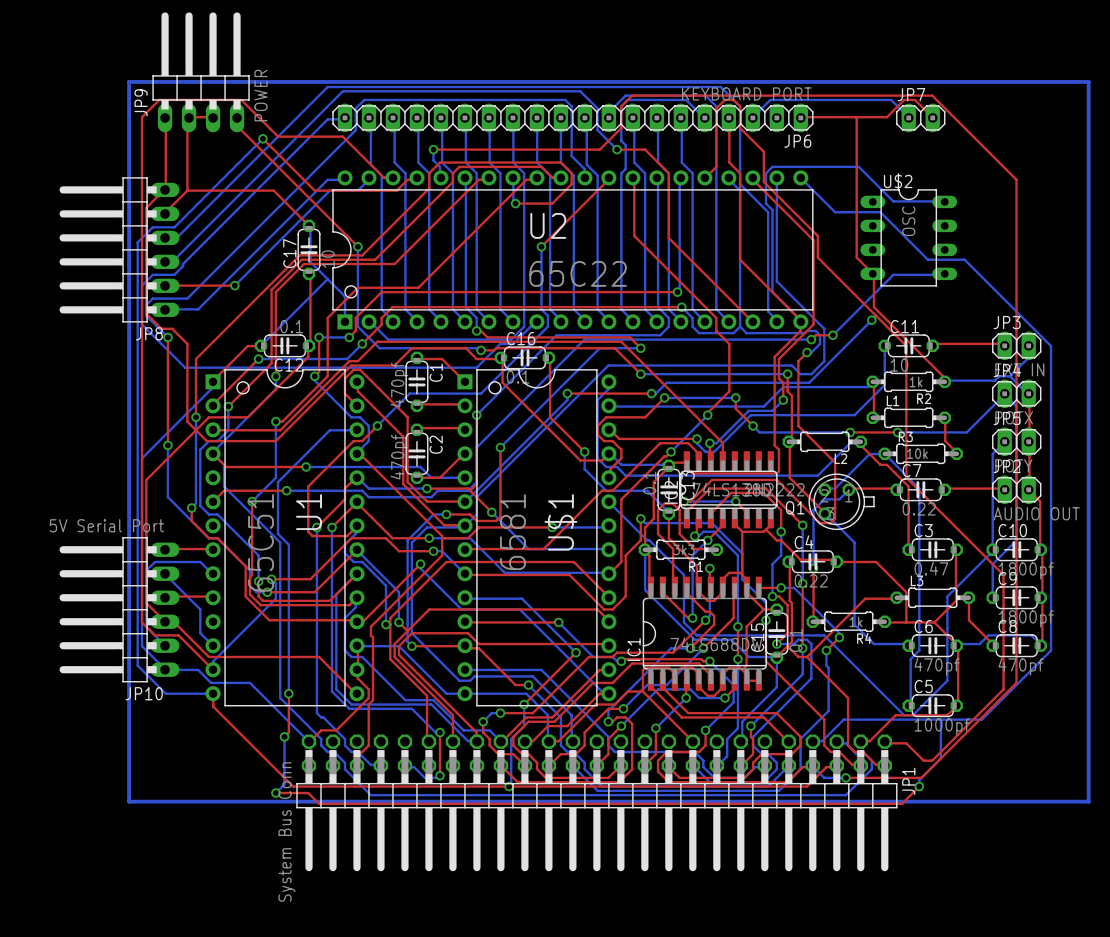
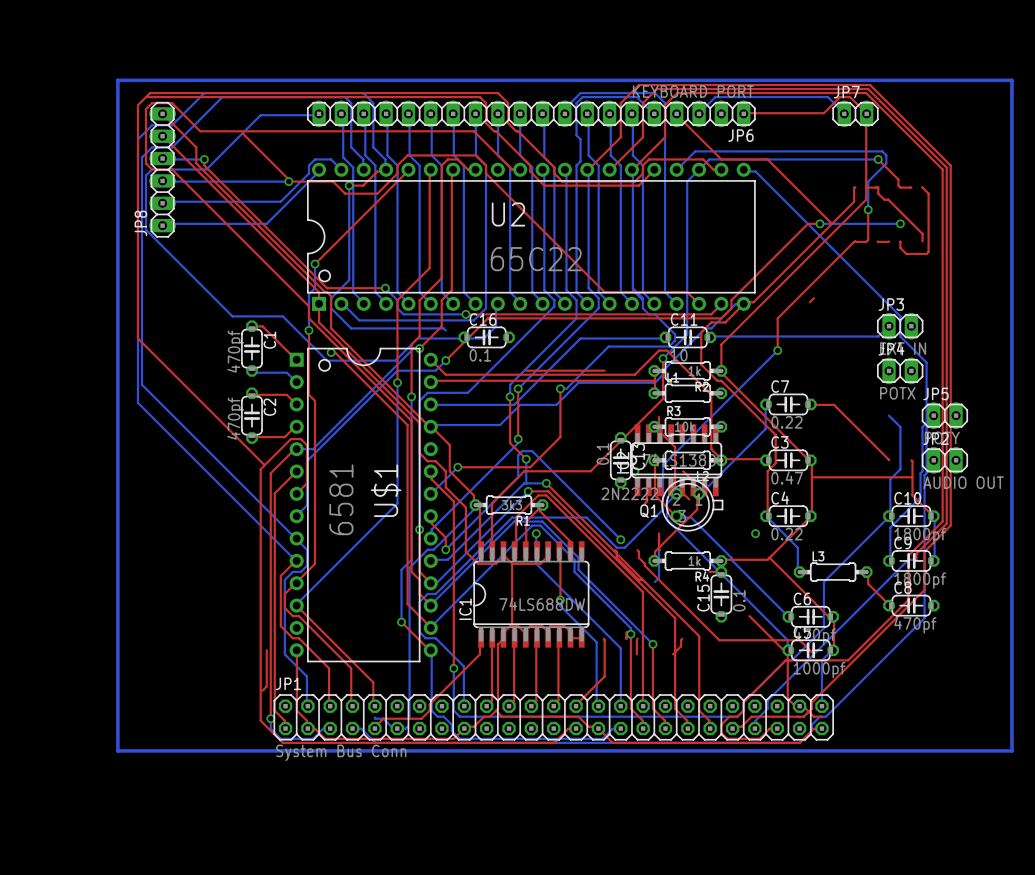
JP9: POWER (201, 72) -> none
top track: (729, 95) (632, 95) (621, 106) (621, 128) (599, 149) (433, 149) -> (677, 93) (673, 97)
top track: none -> (146, 97) (150, 93) (498, 93) (508, 103) (508, 123) (554, 167) (554, 173) (562, 181) (634, 181) (642, 173) (642, 165) (648, 159) (703, 159) (713, 169) (721, 169)
top track: (241, 99) (278, 136) -> (430, 605) (419, 593) (419, 579) (411, 571) (411, 420) (308, 318) (308, 306) (172, 169) (152, 169) (146, 163) (146, 109) (152, 103) (172, 103) (200, 131) (256, 131)
bottom track: (364, 99) (355, 108) (355, 130) (187, 298) (152, 298) (146, 305) (146, 315) (167, 337) -> (337, 97) (222, 97) (172, 147) (152, 147) (142, 157) (142, 384) (306, 549)
bottom track: (373, 99) (565, 99) (571, 106) (571, 156) (584, 169) (584, 177) -> (345, 97) (351, 103) (351, 147) (363, 159) (363, 169)
top track: (724, 99) (733, 99) (740, 106) (740, 128) (763, 151) (763, 181) (817, 235) (817, 257) (906, 346) (906, 477) (1003, 574) (1003, 689) (932, 760) (923, 760) (906, 743) (884, 743) (884, 741) -> none
top track: (150, 108) (142, 117) (142, 622) (154, 635) (178, 635) (213, 669) -> (137, 105) (137, 338) (264, 465)
top track: (165, 117) (165, 188) (146, 207) (146, 313) (161, 328) (172, 328) (187, 343) (187, 421) (206, 441) (275, 441) (351, 365) (394, 365) (411, 348) (465, 348) (476, 359) (502, 359) (502, 382) (580, 460) (601, 460) (608, 453) -> none
top track: (213, 117) (189, 117) (187, 119) (187, 190) -> none
top track: (237, 117) (237, 125) (357, 246) -> none
top track: (856, 117) (856, 257) (873, 274) (873, 307) (943, 376) (944, 381) -> none
top track: none -> (866, 113) (866, 187)
bottom track: (327, 119) (174, 274) (152, 274) (142, 285) (142, 324) (185, 367) (476, 367) (500, 343) (513, 343) (534, 322) -> (206, 169) (152, 169) (146, 175) (146, 229) (232, 316) (282, 316) (327, 360) (395, 360) (417, 338) (484, 338) (496, 326) (496, 304)
bottom track: none -> (302, 115) (260, 115) (242, 133)
top track: (729, 119) (729, 162) (740, 173) (740, 259) (800, 321) -> (677, 115) (721, 159) (767, 159) (832, 223)
top track: (342, 136) (383, 177) (392, 177) -> (317, 131) (473, 131) (502, 159)
via: (262, 138) -> none
top track: none -> (162, 136) (319, 292) (319, 322) (419, 423) (419, 453) (427, 461) (435, 461)
top track: (716, 143) (716, 166) (704, 177) -> (665, 137) (631, 169)
bottom track: (433, 149) (433, 160) (439, 166) (440, 177) -> none
via: (433, 149) -> none
top track: (617, 149) (645, 149) (668, 173) (668, 238) (740, 309) -> (475, 155) (486, 165) (486, 173) (604, 292) (687, 292)
bottom track: (617, 149) (597, 130) (597, 108) (580, 91) (342, 91) (172, 261) (165, 261) -> none
via: (617, 149) -> none
top track: (513, 162) (560, 162) -> (222, 97) (479, 97) (486, 103) (486, 123) (520, 155)
bottom track: none -> (162, 158) (204, 159)
top track: none -> (204, 159) (204, 165) (327, 288) (385, 288)
via: none -> (204, 159)
top track: (483, 166) (459, 166) (452, 173) (452, 181) (375, 259) (301, 259) (271, 289) (271, 363) (228, 406) -> (447, 159) (441, 165) (441, 278) (419, 300) (419, 336) (411, 344) (411, 396)
top track: (493, 166) (541, 166) -> (457, 159) (467, 169) (475, 169)
bottom track: (772, 166) (766, 173) (766, 203) (772, 210) (772, 292) (800, 321) -> none
bottom track: (858, 166) (893, 201) (944, 201) -> (797, 159) (878, 159)
top track: none -> (878, 159) (898, 179) (900, 187) (911, 187)
via: none -> (878, 159)
JP8 footprint: [59, 177, 180, 323] -> [149, 102, 176, 238]
bottom track: (224, 177) (174, 227) (152, 227) (137, 242) (137, 665) (165, 693) (213, 693) -> none
bottom track: (368, 177) (357, 190) (329, 190) (234, 285) -> (341, 169) (331, 159) (315, 159) (308, 165) (308, 173) (280, 201) (164, 201) (162, 203)
bottom track: none -> (386, 169) (385, 159) (373, 147) (373, 103) (363, 93) (204, 93) (172, 125) (152, 125) (137, 139) (137, 402) (296, 560)
top track: none -> (408, 169) (315, 264)
top track: none -> (430, 169) (429, 268) (397, 300) (397, 382)
bottom track: (464, 177) (465, 307) (476, 318) (476, 330) -> none
bottom track: (512, 177) (513, 201) (515, 203) -> none
top track: (536, 177) (534, 179) (526, 179) (418, 287) (357, 287) (327, 318) (327, 376) (282, 421) (275, 421) -> none
bottom track: none -> (542, 169) (544, 171) (544, 290) (554, 300) (554, 306) (467, 392) (427, 392) (419, 400) (419, 529)
top track: (608, 177) (541, 246) -> none
bottom track: none -> (564, 169) (566, 171) (566, 290) (576, 300) (576, 318) (510, 384) (510, 396)
top track: (632, 177) (634, 235) (716, 318) (716, 330) (729, 343) (729, 391) (707, 415) -> (587, 169) (620, 137) (620, 103) (638, 85) (870, 85) (950, 165) (950, 525) (924, 551) (924, 589) (811, 702) (811, 708) (803, 716) (797, 716)
bottom track: none -> (587, 169) (588, 288) (598, 298) (598, 308) (518, 388)
top track: none -> (609, 169) (642, 137) (642, 103) (657, 89) (868, 89) (946, 167) (946, 523) (916, 553) (916, 559)
bottom track: (656, 177) (658, 307) (668, 318) (668, 326) (660, 335) (556, 335) (476, 415) -> none
bottom track: (680, 177) (679, 289) (677, 292) -> (631, 169) (632, 288) (642, 300)
bottom track: (728, 177) (740, 190) -> (717, 159) (709, 159) (687, 181)
bottom track: none -> (676, 169) (695, 151) (882, 151) (886, 155) (886, 163) (868, 181) (868, 209)
top track: (752, 177) (813, 240) (813, 324) (778, 359) (778, 378) (783, 382) (783, 400) -> none
bottom track: (776, 177) (776, 281) (824, 328) (824, 361) (811, 374) (800, 374) (791, 365) (608, 365) (476, 497) (476, 514) -> (457, 467) (441, 483)
top track: (1014, 177) (1016, 179) (1016, 682) (921, 777) (884, 777) -> (942, 169) (942, 521) (908, 555) (908, 600) (848, 660) (785, 660) (743, 702) (743, 710) (737, 716) (729, 716) (721, 724) (721, 732) (727, 738) (759, 738) (769, 728) (777, 728)
bottom track: (344, 179) (327, 179) (198, 309) (165, 309) -> (319, 171) (266, 223) (164, 223) (162, 225)
top track: (487, 179) (478, 179) (394, 264) (303, 264) (275, 292) (275, 376) -> (451, 171) (451, 290) (441, 300) (441, 326) (419, 348)
top track: (571, 179) (571, 184) (552, 203) (515, 203) -> (530, 171) (544, 185) (638, 185) (654, 169)
bottom track: (802, 179) (835, 212) (880, 212) (927, 259) (964, 259) (1051, 346) (1051, 650) (981, 719) (843, 719) (822, 741) (812, 741) -> (745, 171) (755, 171) (900, 316) (900, 336) (926, 362) (924, 618) (825, 716) (819, 716) (811, 724) (811, 730) (799, 742) (375, 742) (361, 728) (352, 728)
top track: (429, 181) (429, 188) (362, 255) (299, 255) (196, 359) (196, 417) -> (397, 173) (377, 193) (345, 193) (333, 181)
bottom track: none -> (162, 180) (288, 181)
top track: (187, 190) (165, 213) -> none
top track: (187, 190) (273, 190) (309, 225) -> none
via: none -> (288, 181)
top track: (360, 190) (396, 190) -> (349, 185) (363, 185) (367, 181)
via: none -> (349, 185)
top track: none -> (855, 187) (854, 201) (753, 302) (743, 303)
top track: none -> (866, 187) (878, 187) (878, 193) (884, 199) (888, 199) (922, 233) (922, 241)
top track: none -> (922, 187) (928, 193) (928, 252) (926, 254) (906, 254) (900, 247) (900, 241)
via: (515, 203) -> none
top track: none -> (868, 209) (868, 239) (866, 241) (854, 241) (777, 318) (777, 350)
via: none -> (868, 209)
bottom track: (309, 225) (310, 261) (344, 296) (344, 321) -> none
bottom track: none -> (819, 223) (900, 223)
via: none -> (819, 223)
via: none -> (900, 223)
bottom track: (165, 237) (165, 235) (178, 235) (327, 86) (720, 86) (740, 106) (740, 184) (768, 212) (768, 311) (776, 321) -> none
U$2: OSC (908, 237) -> none
bottom track: (357, 246) (357, 315) -> (349, 185) (349, 280) (331, 298)
via: (357, 246) -> none
bottom track: (541, 246) (541, 309) (547, 315) (547, 326) (481, 393) (470, 393) -> (445, 360) (435, 370)
via: (541, 246) -> none
C17: 10 (309, 249) -> none
top track: none -> (877, 241) (889, 241)
top track: (309, 273) (310, 343) (308, 346) (308, 356) (247, 417) (208, 417) (146, 479) (146, 603) (165, 622) (174, 622) (208, 657) (316, 657) -> (308, 330) (308, 394) (315, 400) (315, 563) (284, 593) (284, 608) (292, 616)
bottom track: (944, 273) (893, 274) (832, 335) -> none
bottom track: (327, 279) (261, 345) -> none
bottom track: none -> (315, 264) (315, 288) (308, 294) (308, 330)
via: none -> (315, 264)
top track: (234, 285) (165, 285) -> none
via: (234, 285) -> none
top track: (677, 292) (381, 292) (355, 318) (355, 330) (349, 337) -> none
via: (677, 292) -> none
bottom track: none -> (385, 288) (397, 300) (397, 308) (403, 314) (465, 314)
via: none -> (385, 288)
top track: (681, 307) (392, 307) (381, 318) (381, 324) (362, 343) -> none
via: (681, 307) -> none
bottom track: (871, 320) (809, 382) (666, 382) (655, 393) (651, 393) -> none
via: (871, 320) -> none
top track: none -> (721, 303) (711, 314) (465, 314)
top track: (800, 322) (800, 330) (774, 356) (774, 445) (778, 449) (778, 471) (776, 473) (692, 473) (688, 469) (686, 460) (686, 462) (671, 462) (653, 482) (653, 518) (645, 527) (644, 549) (649, 555) (650, 586) -> none
bottom track: none -> (687, 308) (687, 334) (663, 358)
top track: (476, 330) (481, 330) (487, 337) (526, 337) -> (445, 360) (488, 318)
via: (476, 330) -> none
JP8 name position: JP8 (149, 333) -> JP8 (140, 223)
via: none -> (465, 314)
bottom track: (705, 333) (733, 333) (740, 326) (746, 333) (804, 333) (807, 330) (815, 330) (819, 335) (819, 343) (811, 352) (807, 352) -> (654, 314) (675, 334) (675, 340) (669, 346) (608, 346) (566, 388) (560, 388)
top track: (832, 335) (815, 335) (811, 339) -> none
via: (832, 335) -> none
top track: (167, 337) (167, 445) -> none
via: (167, 337) -> none
top track: (319, 337) (319, 371) (314, 376) -> none
bottom track: (319, 337) (349, 337) -> none
via: (319, 337) -> none
via: (349, 337) -> none
top track: (629, 337) (640, 348) -> (584, 318) (721, 318) (731, 308) (731, 300) (807, 223) (819, 223)
bottom track: (811, 339) (584, 339) (476, 447) (476, 482) (468, 490) (437, 490) (431, 497) (368, 497) (362, 490) (286, 490) -> none
via: (811, 339) -> none
bottom track: (362, 343) (347, 359) (258, 359) -> none
via: (362, 343) -> none
top track: (261, 345) (247, 346) (213, 381) -> none
top track: none -> (251, 326) (262, 326) (296, 359)
C12: 0.1 (285, 345) -> none
bottom track: (884, 345) (884, 384) (854, 415) (750, 415) (714, 451) (705, 451) (696, 443) (696, 438) -> none
C11 position: (908, 345) -> (687, 337)
top track: (932, 345) (934, 343) (1003, 343) (1004, 345) -> none
bottom track: none -> (889, 326) (878, 336) (710, 337)
JP3 position: (1016, 345) -> (900, 326)
bottom track: (1028, 345) (1027, 359) (1010, 376) -> none
bottom track: (640, 348) (599, 348) (500, 447) -> none
via: (640, 348) -> none
via: none -> (308, 330)
top track: (481, 350) (493, 350) (496, 348) (614, 348) (640, 374) -> none
via: (481, 350) -> none
top track: (807, 352) (798, 361) (798, 425) -> (743, 304) (725, 322) (711, 322) (701, 332) (701, 364) (741, 400)
via: (807, 352) -> none
top track: (416, 357) (442, 359) (464, 381) -> (721, 459) (711, 449) (711, 394) (667, 350) (659, 350) (634, 374) (445, 374) (430, 359)
top track: (548, 357) (550, 417) (584, 451) -> none
bottom track: none -> (665, 337) (580, 338) (514, 404) (430, 404)
top track: (258, 359) (213, 405) -> none
via: (258, 359) -> none
bottom track: none -> (419, 348) (413, 348) (313, 449) (296, 449)
via: none -> (419, 348)
via: none -> (777, 350)
top track: none -> (331, 352) (335, 352) (407, 425) (407, 604) (430, 627)
via: none -> (331, 352)
bottom track: (640, 374) (787, 374) -> none
via: (640, 374) -> none
top track: (787, 374) (787, 391) (791, 395) (791, 438) (788, 441) (789, 477) (824, 513) -> none
via: (787, 374) -> none
bottom track: (275, 376) (275, 389) (213, 453) (224, 464) (224, 486) (280, 542) (280, 698) (321, 739) (321, 745) (327, 752) (334, 752) (344, 762) (344, 769) (370, 795) (845, 795) (871, 769) (871, 760) (865, 754) (856, 754) (845, 743) (837, 743) (836, 741) -> none
via: (275, 376) -> none
bottom track: (314, 376) (314, 380) (351, 417) (360, 417) (368, 425) (368, 441) (356, 453) -> none
via: (314, 376) -> none
bottom track: (1010, 376) (999, 376) (994, 380) (944, 381) -> none
bottom track: (1010, 376) (1028, 393) -> none
top track: none -> (663, 358) (663, 398) (590, 471) (524, 471) (492, 503) (492, 550)
via: none -> (663, 358)
bottom track: (213, 381) (211, 382) (211, 389) (142, 458) (142, 646) (165, 669) (198, 669) (211, 682) (249, 682) (309, 741) -> none
top track: (356, 381) (357, 391) (403, 436) (403, 484) (444, 525) (464, 525) -> none
C1 position: (416, 381) -> (251, 348)
bottom track: (608, 381) (608, 389) (597, 400) (597, 458) (606, 466) (617, 466) (625, 475) (817, 475) (850, 443) (860, 441) -> none
top track: (872, 381) (872, 417) -> none
bottom track: (872, 381) (867, 387) (783, 387) (763, 406) (705, 406) -> (743, 303) (735, 304) (711, 328) (705, 328) (663, 370) (663, 374) (654, 382)
R2 position: (908, 381) -> (687, 370)
via: none -> (445, 360)
bottom track: none -> (251, 370) (252, 372) (286, 372) (296, 382)
bottom track: (429, 393) (409, 393) (377, 425) -> (397, 370) (306, 461) (306, 495)
bottom track: (567, 393) (567, 400) (464, 501) -> none
via: (567, 393) -> none
via: (651, 393) -> none
top track: none -> (654, 370) (654, 393)
JP4 position: (1016, 393) -> (900, 370)
top track: (1028, 393) (1028, 489) (1040, 501) (1040, 549) (1042, 551) (1042, 596) (1040, 597) (1042, 598) (1042, 644) (1040, 645) -> none
top track: (664, 397) (645, 417) (606, 417) (597, 425) (597, 434) (604, 441) (612, 441) (621, 449) (621, 458) (610, 469) (610, 477) (608, 477) -> none
bottom track: (664, 397) (735, 397) -> none
via: (664, 397) -> none
top track: (735, 397) (735, 408) (753, 425) -> none
via: (735, 397) -> none
bottom track: (783, 400) (772, 410) (748, 410) (716, 443) (709, 443) -> none
via: (783, 400) -> none
top track: (356, 405) (344, 393) (344, 378) (353, 369) (360, 369) (407, 417) (407, 482) (427, 501) (464, 501) -> none
top track: (416, 405) (464, 405) -> (654, 380) (430, 382)
bottom track: (608, 405) (623, 406) -> (430, 426) (431, 425) (500, 425) (520, 404) (556, 404) (578, 382)
bottom track: (228, 406) (228, 430) (217, 441) (208, 441) (200, 449) (200, 505) (208, 514) (217, 514) (258, 555) (258, 581) -> none
via: (228, 406) -> none
bottom track: none -> (397, 382) (397, 503) (296, 605)
via: none -> (397, 382)
top track: none -> (518, 388) (518, 439)
via: none -> (518, 388)
top track: none -> (560, 388) (560, 437) (530, 467) (457, 467)
via: none -> (560, 388)
top track: (476, 415) (476, 484) (470, 490) (468, 488) (427, 488) -> none
via: (476, 415) -> none
bottom track: (707, 415) (671, 451) -> none
via: (707, 415) -> none
bottom track: (196, 417) (196, 503) (191, 508) -> none
via: (196, 417) -> none
top track: none -> (251, 393) (252, 394) (286, 394) (296, 404)
L1 position: (908, 417) -> (687, 393)
top track: (944, 417) (945, 441) (956, 453) -> none
bottom track: (275, 421) (275, 477) (252, 501) -> none
via: (275, 421) -> none
bottom track: none -> (411, 396) (411, 559) (401, 569) (401, 622)
via: none -> (411, 396)
top track: none -> (510, 396) (510, 443) (526, 459)
via: none -> (510, 396)
top track: (377, 425) (362, 441) (353, 441) (308, 486) (308, 531) (312, 536) (347, 536) (356, 525) -> none
via: (377, 425) -> none
bottom track: (753, 425) (759, 432) (850, 432) -> none
via: (753, 425) -> none
top track: (213, 429) (280, 430) (349, 361) (357, 361) (377, 341) (621, 341) (722, 443) (722, 460) -> none
bottom track: (356, 429) (329, 430) (278, 482) (278, 533) (288, 544) (288, 693) -> none
top track: (416, 429) (418, 428) (463, 428) (464, 429) -> none
top track: (608, 429) (619, 438) (696, 438) -> none
bottom track: none -> (766, 404) (765, 429) (699, 495) (699, 493)
top track: none -> (810, 404) (834, 404) (889, 460)
top track: (850, 432) (897, 432) -> none
via: (850, 432) -> none
bottom track: (897, 432) (966, 432) (1004, 393) (1016, 406) (1016, 540) (992, 564) (992, 597) -> none
via: (897, 432) -> none
via: (696, 438) -> none
L2 position: (824, 441) -> (687, 460)
top track: (860, 441) (858, 443) (880, 464) (886, 464) (908, 486) (908, 549) -> none
via: (709, 443) -> none
bottom track: (167, 445) (167, 497) (208, 538) (217, 538) (249, 570) (249, 585) (256, 592) (267, 592) -> none
via: (167, 445) -> none
top track: (500, 447) (500, 516) (496, 520) (476, 520) -> (453, 668) (453, 501) (441, 489)
via: (500, 447) -> none
bottom track: (584, 451) (584, 469) (606, 490) (647, 490) (668, 513) -> none
via: (584, 451) -> none
top track: (671, 451) (621, 499) (621, 562) (608, 573) -> none
via: (671, 451) -> none
top track: (213, 453) (226, 466) (306, 466) -> none
top track: none -> (296, 426) (284, 437) (251, 437)
top track: (356, 453) (357, 451) (442, 536) (442, 555) (370, 626) (370, 635) (373, 637) (373, 700) (368, 704) (368, 745) (357, 756) (356, 765) -> none
C2 position: (416, 453) -> (251, 415)
top track: none -> (430, 426) (449, 445) (449, 471) (473, 495) (473, 503) (479, 509) (481, 550)
bottom track: (608, 453) (621, 464) (668, 465) -> none
top track: none -> (654, 426) (675, 447) (675, 493) (676, 493)
R3 position: (920, 453) -> (687, 426)
top track: (463, 454) (439, 477) (416, 477) -> (429, 427) (331, 328) (331, 296) (196, 163) (196, 147) (162, 113)
bottom track: (884, 454) (869, 454) (835, 488) (824, 489) -> none
bottom track: (884, 454) (919, 488) (919, 650) (910, 659) (910, 704) (908, 705) -> none
top track: (698, 460) (696, 460) (696, 451) (688, 443) (660, 443) (612, 490) (601, 490) (543, 549) (464, 549) -> (445, 549) (445, 537) (431, 523) (430, 516)
bottom track: (306, 466) (420, 466) (431, 477) (464, 477) -> none
via: (306, 466) -> none
via: none -> (518, 439)
top track: none -> (296, 449) (270, 473) (270, 718)
top track: (356, 477) (344, 488) (344, 499) (316, 527) -> none
bottom track: (356, 477) (368, 488) (427, 488) -> none
via: (427, 488) -> none
bottom track: none -> (526, 459) (526, 483)
via: none -> (526, 459)
top track: none -> (721, 459) (766, 460)
top track: none -> (654, 460) (654, 495) (676, 516)
top track: (848, 489) (896, 489) -> none
bottom track: (848, 489) (839, 499) (824, 499) (813, 510) (813, 568) -> none
C7 position: (920, 489) -> (788, 404)
top track: (944, 489) (1004, 489) -> none
top track: none -> (911, 460) (912, 495) (933, 516)
top track: (286, 490) (224, 490) (213, 501) -> none
via: (286, 490) -> none
top track: (835, 492) (835, 518) (830, 523) (819, 523) (776, 479) (712, 479) (690, 501) (683, 501) (677, 508) -> (775, 463) (767, 471) (767, 515) (766, 516)
top track: (252, 501) (252, 574) (249, 577) (249, 594) (260, 605) (349, 605) (356, 597) -> none
via: (252, 501) -> none
top track: none -> (296, 471) (274, 493) (274, 710) (284, 720) (285, 728)
top track: (481, 501) (491, 512) -> (445, 471) (445, 487) (465, 507) (465, 551) (477, 563) (496, 563) (504, 555)
bottom track: (683, 501) (735, 501) -> none
via: (735, 501) -> none
Q1 position: (841, 501) -> (692, 505)
bottom track: (992, 501) (992, 551) (947, 596) (947, 680) (912, 715) (904, 715) (824, 635) (696, 635) (683, 622) (683, 574) (608, 501) -> (922, 471) (920, 473) (920, 497) (890, 527) (889, 560)
top track: (191, 508) (191, 520) (208, 538) (217, 538) (245, 566) (245, 596) (269, 620) (364, 620) (420, 564) -> none
via: (191, 508) -> none
top track: none -> (811, 477) (912, 477)
bottom track: (491, 512) (528, 549) (608, 549) -> none
via position: (491, 512) -> (457, 467)
top track: (668, 513) (668, 538) (696, 566) (696, 585) (698, 586) (699, 592) (707, 600) (714, 600) (722, 592) (722, 579) (729, 572) (740, 572) (746, 579) (748, 594) (763, 609) (746, 626) (746, 665) (742, 669) -> none
bottom track: (824, 513) (854, 542) (854, 624) (873, 644) (908, 644) (908, 645) -> none
top track: (446, 514) (470, 514) -> (430, 471) (431, 479) (435, 483)
bottom track: (446, 514) (433, 514) (407, 540) (407, 641) (411, 646) -> none
via: (446, 514) -> none
via: none -> (546, 483)
top track: (640, 518) (640, 540) (625, 555) (625, 596) (612, 609) (604, 609) (569, 574) (464, 573) -> none
bottom track: (640, 518) (645, 523) (712, 523) (742, 553) (742, 579) (766, 603) (766, 620) -> none
via: (640, 518) -> none
top track: (686, 518) (688, 510) (709, 488) (766, 488) (802, 525) -> none
top track: (710, 518) (712, 512) (731, 492) (763, 492) (781, 510) (781, 531) -> none
top track: (722, 518) (722, 525) (707, 540) -> none
top track: (770, 518) (770, 525) (763, 531) (742, 531) (742, 574) -> none
top track: none -> (528, 491) (548, 491) (675, 618) (675, 708) (687, 720) (687, 728)
bottom track: none -> (528, 491) (437, 581) (430, 583)
bottom track: (356, 525) (355, 533) (344, 544) (344, 553) (353, 562) (362, 562) (386, 585) (386, 624) -> none
bottom track: (464, 525) (463, 527) (427, 527) (411, 542) (411, 633) (452, 674) -> (777, 350) (663, 465) (663, 509) (624, 547) (616, 547) (586, 517) (512, 517) (435, 593) (427, 593) (419, 602) (419, 632)
bottom track: (608, 525) (608, 527) (552, 527) -> none
bottom track: none -> (676, 493) (667, 503) (667, 519) (787, 640) (788, 650)
top track: none -> (699, 493) (697, 495) (697, 509) (654, 551) (654, 560)
bottom track: (802, 525) (802, 583) -> none
via: (802, 525) -> none
bottom track: (316, 527) (316, 713) (344, 739) (344, 745) (351, 752) (357, 752) (370, 764) (380, 765) -> none
via: (316, 527) -> none
top track: (332, 527) (356, 501) (392, 538) (429, 538) -> none
via: (332, 527) -> none
top track: (552, 527) (478, 527) (468, 538) (442, 538) -> none
via position: (552, 527) -> (528, 491)
top track: (766, 529) (776, 540) (781, 540) (800, 559) (876, 562) (906, 592) (906, 622) -> none
bottom track: (781, 531) (781, 555) (772, 564) (772, 596) -> none
via: (781, 531) -> none
bottom track: (694, 536) (699, 536) (703, 531) (714, 531) (737, 555) (737, 626) -> none
via: (694, 536) -> none
U1: 65C51 (285, 537) -> none
bottom track: none -> (475, 505) (473, 509) (433, 549) (427, 549) (409, 567) (409, 718)
U$1 position: (536, 537) -> (363, 505)
top track: none -> (542, 505) (526, 521) (525, 550)
bottom track: (332, 538) (332, 585) -> (306, 505) (296, 516)
bottom track: (429, 538) (470, 538) (504, 572) (608, 573) -> none
via: (429, 538) -> none
bottom track: (707, 540) (692, 555) (692, 618) -> none
via: (707, 540) -> none
top track: none -> (538, 509) (570, 541) (570, 550)
top track: (165, 549) (213, 549) -> none
top track: (356, 549) (314, 592) (267, 592) -> none
bottom track: (356, 549) (398, 592) (398, 622) -> none
bottom track: (644, 549) (645, 590) (694, 639) (731, 639) (748, 657) (776, 657) (776, 687) (742, 721) (740, 741) -> none
R1 position: (680, 549) -> (509, 505)
top track: (716, 549) (694, 549) (679, 533) (679, 510) (673, 503) (664, 503) (658, 510) (658, 533) (673, 549) (673, 585) (674, 586) -> none
bottom track: none -> (676, 516) (691, 517) (788, 616)
bottom track: none -> (766, 516) (797, 547) (797, 571) (799, 572)
C3 position: (932, 549) -> (788, 460)
top track: (956, 549) (956, 600) (934, 622) (884, 621) -> none
bottom track: none -> (933, 516) (933, 560)
C10 position: (1016, 549) -> (911, 516)
top track: (433, 551) (398, 551) (386, 538) (351, 538) (310, 579) (271, 579) -> none
bottom track: (433, 551) (442, 551) (464, 573) -> (518, 439) (518, 443) (431, 529) (430, 538)
via: (433, 551) -> none
top track: (788, 561) (789, 600) (791, 603) (791, 641) (776, 657) -> none
C4 position: (812, 561) -> (788, 516)
bottom track: (420, 564) (420, 568) (461, 609) (519, 609) (604, 693) (608, 693) -> none
via: (420, 564) -> none
via: none -> (419, 529)
bottom track: none -> (536, 533) (536, 563) (620, 648) (620, 706)
via: none -> (536, 533)
via: (709, 568) -> none
top track: (813, 568) (812, 621) -> none
bottom track: (165, 573) (200, 609) (200, 633) (213, 645) -> none
bottom track: (213, 573) (200, 562) (154, 562) (146, 570) (146, 626) (165, 645) -> none
top track: (356, 573) (329, 600) (262, 600) (258, 596) (258, 581) -> none
bottom track: (356, 573) (336, 594) (336, 689) (351, 704) (431, 704) (468, 741) (476, 741) -> none
bottom track: none -> (620, 539) (532, 451) (522, 451) (518, 455) (518, 477) (445, 549)
via: none -> (620, 539)
bottom track: (271, 579) (275, 583) (275, 598) (213, 661) (213, 669) -> none
via: (271, 579) -> none
via: (258, 581) -> none
top track: (802, 583) (802, 648) -> none
via: (802, 583) -> none
via: none -> (445, 549)
top track: none -> (514, 550) (516, 549) (516, 517) (538, 495) (546, 495) (642, 591) (643, 706)
top track: none -> (548, 550) (546, 557) (540, 563) (512, 563)
top track: none -> (559, 550) (560, 600)
top track: (734, 586) (733, 618) (703, 648) -> none
top track: (758, 586) (759, 587) (781, 587) -> none
bottom track: (781, 587) (794, 587) (839, 633) (839, 637) -> none
via: (781, 587) -> none
via: (267, 592) -> none
top track: none -> (769, 557) (828, 616) (833, 616) (833, 650)
via: (772, 596) -> none
top track: (778, 596) (787, 605) (787, 633) (776, 644) -> (723, 559) (767, 559) (811, 515) (811, 461) (721, 372) (721, 344) (866, 199) (866, 187)
bottom track: none -> (916, 559) (908, 559) (767, 700) (767, 708) (755, 720) (754, 728)
top track: (165, 597) (213, 597) -> none
top track: none -> (296, 560) (280, 575) (280, 626) (292, 638) (298, 638) (329, 668) (330, 706)
bottom track: (356, 597) (355, 607) (344, 618) (344, 650) (351, 657) (362, 657) (405, 700) (433, 700) (463, 730) (489, 730) (500, 741) -> none
bottom track: (464, 597) (522, 598) (576, 652) -> (430, 560) (447, 559) (524, 483) (546, 483)
top track: (608, 597) (573, 562) (446, 562) (390, 618) (390, 659) (427, 695) (427, 741) (428, 741) -> none
top track: (896, 597) (865, 598) (807, 657) (798, 657) (787, 646) -> none
L3 position: (932, 597) -> (833, 572)
top track: (968, 597) (968, 620) (992, 645) -> none
C9 position: (1016, 597) -> (911, 560)
top track: none -> (512, 563) (512, 626)
top track: (694, 600) (705, 611) (709, 611) (714, 615) (714, 624) (690, 648) -> (644, 563) (719, 640) (799, 640) (811, 652)
bottom track: (332, 603) (332, 691) (349, 708) (411, 708) (435, 732) (439, 732) -> (306, 565) (300, 571) (292, 571) (284, 579) (284, 654) (306, 676) (307, 706)
JP10: 5V Serial Port (119, 609) -> none
top track: none -> (866, 572) (868, 583)
via: (692, 618) -> none
top track: (705, 620) (673, 652) (617, 652) (612, 657) (588, 657) (532, 713) (500, 713) -> none
via: (705, 620) -> none
top track: (766, 620) (766, 661) (824, 719) (824, 745) (830, 752) (839, 752) (852, 764) -> (732, 728) (733, 726) (741, 726) (751, 716) (791, 716)
via: (766, 620) -> none
top track: (464, 621) (558, 622) -> (430, 583) (419, 571) (419, 529)
top track: (608, 621) (597, 609) (429, 609) (394, 644) (394, 657) (452, 715) (452, 741) -> none
R4 position: (848, 621) -> (687, 560)
top track: (398, 622) (407, 631) -> (504, 555) (512, 563)
via: (398, 622) -> none
bottom track: (558, 622) (593, 657) (612, 657) (617, 661) (621, 661) -> none
via: (558, 622) -> none
via: (386, 624) -> none
top track: (737, 626) (737, 659) -> none
via: (737, 626) -> none
IC1 position: (704, 633) -> (531, 594)
top track: (839, 637) (826, 650) -> none
via: (839, 637) -> none
bottom track: none -> (560, 600) (560, 606) (596, 642) (596, 704) (598, 706)
via: none -> (560, 600)
bottom track: (776, 644) (794, 644) (798, 639) (807, 639) (811, 644) (811, 678) (753, 736) (753, 745) (761, 754) (768, 754) (776, 762) (776, 769) (763, 782) (709, 782) (692, 765) -> none
via: (776, 644) -> none
top track: none -> (296, 605) (373, 682) (374, 706)
top track: (356, 645) (357, 678) (368, 689) (368, 698) (336, 730) (321, 730) (309, 741) (309, 765) -> none
bottom track: (356, 645) (398, 646) (446, 693) (464, 693) -> none
bottom track: none -> (430, 605) (514, 521) (542, 521) (578, 557) (578, 569) (652, 644)
top track: (608, 645) (608, 644) (478, 644) (468, 633) (411, 633) (398, 646) (398, 654) (476, 732) (476, 741) -> none
C6 position: (932, 645) -> (810, 616)
top track: (956, 645) (958, 704) (947, 715) (895, 715) (869, 741) (860, 741) -> none
bottom track: (956, 645) (958, 644) (979, 644) (988, 635) (1031, 635) (1040, 645) -> none
C8 position: (1016, 645) -> (911, 605)
top track: (411, 646) (464, 645) (468, 648) (478, 648) (515, 685) (528, 685) -> none
via: (411, 646) -> none
bottom track: (690, 648) (671, 648) (608, 710) (608, 721) -> none
via: (690, 648) -> none
bottom track: (703, 648) (666, 685) (647, 685) (623, 708) -> none
via: (703, 648) -> none
bottom track: (802, 648) (802, 674) (750, 726) -> none
via: (802, 648) -> none
bottom track: (826, 650) (826, 665) (828, 667) (828, 710) (800, 739) (800, 749) -> (889, 415) (900, 427) (900, 469) (890, 479) (890, 515) (823, 581) (823, 628) (791, 660) (785, 660) (743, 702)
via: (826, 650) -> none
top track: (576, 652) (524, 704) -> none
via: (576, 652) -> none
top track: (319, 657) (356, 693) -> (294, 616) (298, 616) (351, 668) (352, 706)
bottom track: (737, 659) (737, 728) (727, 739) (727, 756) (716, 765) -> none
via: (737, 659) -> none
top track: (621, 661) (623, 659) (701, 659) (703, 661) (709, 661) -> none
via: (621, 661) -> none
bottom track: (709, 661) (733, 685) (733, 702) (705, 730) -> none
via: (709, 661) -> none
top track: none -> (401, 622) (430, 650)
via: none -> (401, 622)
bottom track: (464, 669) (541, 669) (608, 736) (608, 745) (614, 752) (694, 752) (703, 760) (703, 767) (714, 777) (744, 777) (755, 767) (764, 765) -> (430, 627) (532, 525) (540, 525) (574, 559) (574, 571) (630, 628) (630, 634)
top track: (608, 669) (599, 669) (552, 717) (526, 717) (500, 741) -> none
top track: none -> (630, 634) (630, 708) (642, 720) (643, 728)
via: none -> (630, 634)
bottom track: (470, 680) (474, 676) (532, 676) (571, 715) (572, 741) -> (435, 638) (463, 666) (464, 706)
top track: none -> (570, 638) (581, 638)
top track: none -> (481, 638) (479, 654) (429, 704) (429, 710) (421, 718) (383, 718) (374, 728)
top track: none -> (492, 638) (492, 700) (486, 706)
top track: none -> (514, 638) (514, 700) (509, 706)
top track: none -> (536, 638) (536, 700) (531, 706)
top track: none -> (559, 638) (558, 700) (553, 706)
top track: none -> (570, 638) (570, 632) (564, 626) (550, 626) (546, 630) (542, 626) (530, 626) (524, 632) (518, 626) (510, 626) (504, 632) (504, 638) (498, 644) (498, 708) (490, 716) (484, 716) (473, 726) (465, 726) (453, 738) (325, 738) (315, 728) (307, 728) (306, 720) (296, 710) (296, 650)
top track: (662, 681) (664, 689) (688, 713) (776, 713) (800, 736) (800, 745) (791, 754) (761, 754) (753, 762) (753, 769) (744, 777) (679, 777) (668, 765) -> none
top track: (710, 681) (709, 674) (699, 663) (632, 663) (612, 682) (593, 682) (554, 721) (528, 721) (513, 736) (513, 745) (522, 754) (528, 754) (537, 762) (537, 769) (545, 777) (608, 777) (620, 765) -> none
top track: (758, 681) (746, 681) (746, 674) (740, 667) (729, 667) (722, 674) (722, 687) (714, 695) (707, 695) (699, 687) (696, 672) (692, 667) (681, 667) (675, 674) (668, 667) (645, 667) (642, 669) (642, 691) -> none
bottom track: (528, 685) (560, 717) (560, 745) (567, 752) (573, 752) (584, 762) (584, 769) (601, 786) (768, 786) (788, 765) -> none
via: (528, 685) -> none
top track: (651, 687) (681, 717) (763, 717) (788, 741) -> (604, 644) (604, 676) (576, 706)
top track: none -> (652, 644) (652, 708) (665, 720) (665, 728)
via: none -> (652, 644)
top track: (642, 691) (692, 741) -> none
top track: (642, 691) (627, 691) (614, 704) (595, 704) (558, 741) (548, 741) -> none
top track: (213, 693) (213, 706) (293, 786) (807, 786) (826, 767) (836, 765) -> none
via: (288, 693) -> none
bottom track: (465, 693) (526, 693) (547, 715) (548, 741) -> (431, 650) (431, 710) (437, 716) (443, 716) (451, 724) (451, 730) (459, 738) (602, 738) (612, 728) (620, 728)
top track: (608, 693) (599, 693) (567, 726) (547, 726) (532, 741) (524, 741) -> none
bottom track: none -> (833, 650) (821, 660) (821, 706)
bottom track: (686, 698) (655, 728) -> none
via: (686, 698) -> none
bottom track: (724, 698) (699, 698) (690, 689) (658, 689) (621, 726) -> none
via: (724, 698) -> none
bottom track: (524, 704) (524, 726) (511, 739) (511, 784) (509, 786) -> none
via: (524, 704) -> none
C5 position: (932, 705) -> (810, 650)
top track: (623, 708) (608, 708) (584, 732) (584, 745) (576, 754) (560, 754) (548, 765) -> none
via: (623, 708) -> none
via: none -> (453, 668)
bottom track: (500, 713) (491, 713) (483, 721) -> none
via: (500, 713) -> none
bottom track: (940, 719) (940, 758) (919, 780) (919, 786) -> none
top track: (483, 721) (483, 732) (489, 739) (489, 745) (498, 754) (513, 754) (524, 765) -> none
via: (483, 721) -> none
top track: (608, 721) (612, 721) (617, 717) (625, 717) (632, 723) (632, 769) (619, 782) (517, 782) (500, 765) -> none
via: (608, 721) -> none
top track: (621, 726) (608, 739) (608, 754) (596, 765) -> none
via: (621, 726) -> none
top track: (750, 726) (750, 736) (753, 739) -> (546, 483) (699, 636) (699, 692)
via: (750, 726) -> none
top track: (655, 728) (655, 754) (644, 765) -> none
via: (655, 728) -> none
top track: (705, 730) (705, 745) (699, 752) (666, 752) (658, 760) (658, 771) (668, 782) (787, 782) (802, 767) (812, 765) -> none
via: (705, 730) -> none
top track: (439, 732) (439, 775) -> none
via: (439, 732) -> none
JP1 footprint: [296, 734, 898, 872] -> [273, 694, 834, 741]
bottom track: (284, 736) (284, 784) (275, 793) -> none
via: (284, 736) -> none
top track: (753, 754) (740, 765) -> (699, 706) (699, 710) (709, 720) (710, 728)
bottom track: (800, 758) (800, 769) (778, 790) (597, 790) (572, 765) -> (743, 710) (737, 716) (459, 716) (453, 710) (453, 668)
bottom track: (812, 765) (824, 777) (845, 777) -> none
bottom track: none -> (270, 718) (270, 728) (280, 738) (313, 738) (323, 728) (330, 728)
via: none -> (270, 718)
via: (439, 775) -> none
top track: (845, 777) (876, 777) -> (496, 710) (502, 716) (578, 716) (588, 726) (596, 726) (612, 742) (799, 742) (813, 728)
via: (845, 777) -> none
JP1 name position: JP1 (908, 781) -> JP1 (288, 683)
via: (509, 786) -> none
top track: (919, 786) (902, 803) (319, 803) (308, 793) -> (576, 728) (568, 728) (554, 742) (284, 742)
via: (919, 786) -> none
top track: (275, 793) (306, 793) -> (296, 493) (306, 483) (306, 445) (300, 439) (290, 439) (260, 469) (260, 720) (282, 742)
via: (275, 793) -> none
JP1 value position: System Bus Conn (287, 832) -> System Bus Conn (341, 752)

